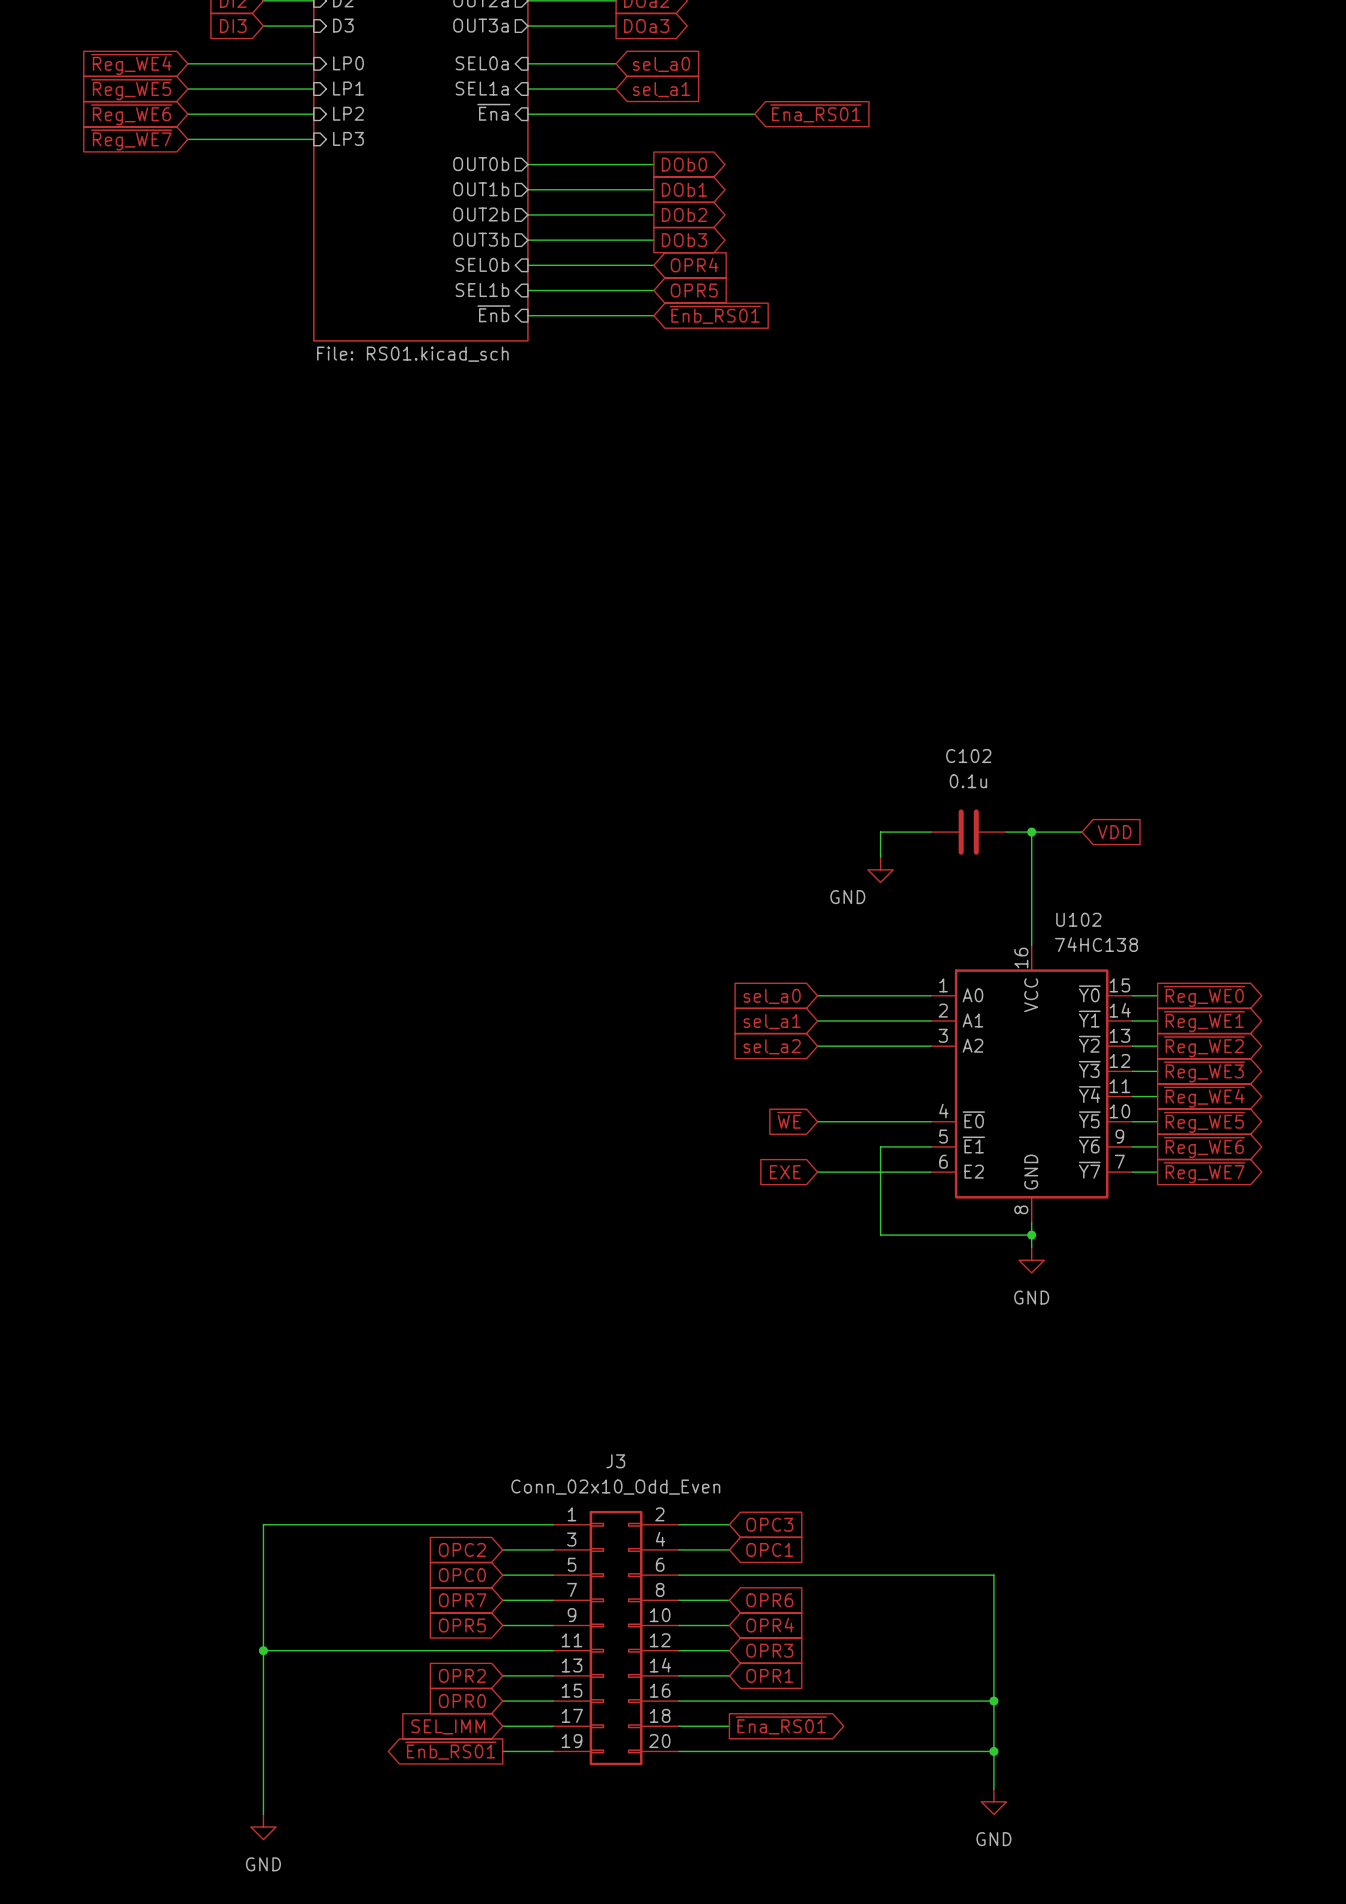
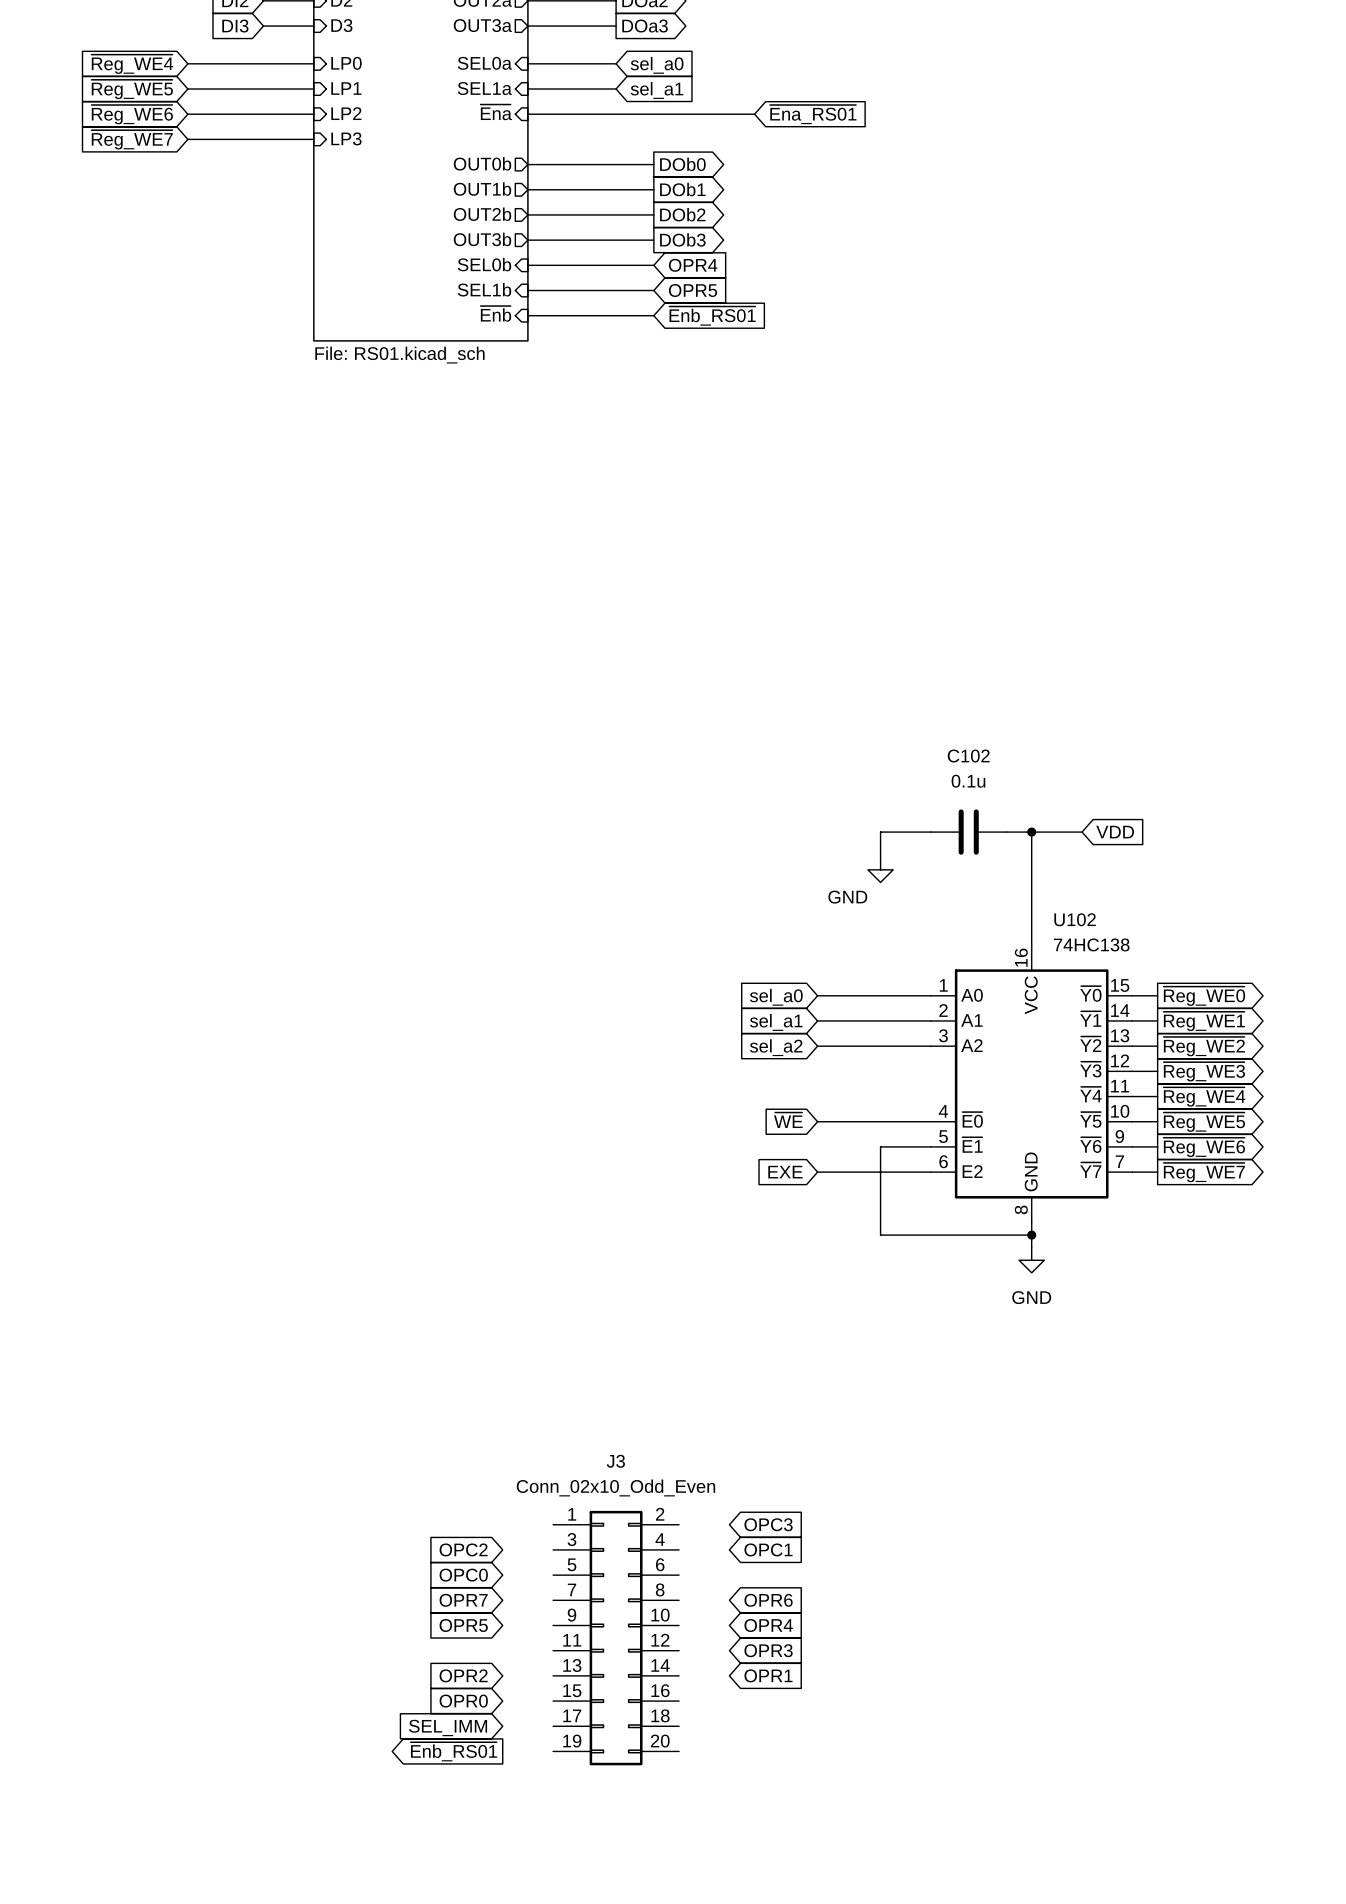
wire: (553, 1524) (263, 1524) (263, 1814) -> none
wire: (679, 1524) (729, 1524) -> none
wire: (502, 1549) (553, 1549) -> none
wire: (679, 1549) (729, 1549) -> none
wire: (502, 1575) (553, 1575) -> none
wire: (679, 1575) (993, 1575) (993, 1789) -> none
wire: (502, 1600) (553, 1600) -> none
wire: (679, 1600) (729, 1600) -> none
wire: (502, 1625) (553, 1625) -> none
wire: (679, 1625) (729, 1625) -> none
wire: (263, 1650) (553, 1650) -> none
junction: (263, 1650) -> none
wire: (679, 1650) (729, 1650) -> none
wire: (502, 1675) (553, 1675) -> none
wire: (679, 1675) (729, 1675) -> none
wire: (502, 1701) (553, 1701) -> none
wire: (679, 1701) (993, 1701) -> none
junction: (993, 1701) -> none
global label: ~{Ena_RS01} (781, 1725) -> none
wire: (502, 1726) (553, 1726) -> none
wire: (679, 1726) (729, 1726) -> none
wire: (502, 1751) (553, 1751) -> none
wire: (679, 1751) (993, 1751) -> none
junction: (993, 1751) -> none
power symbol: GND (993, 1801) -> none
power symbol: GND (263, 1827) -> none

